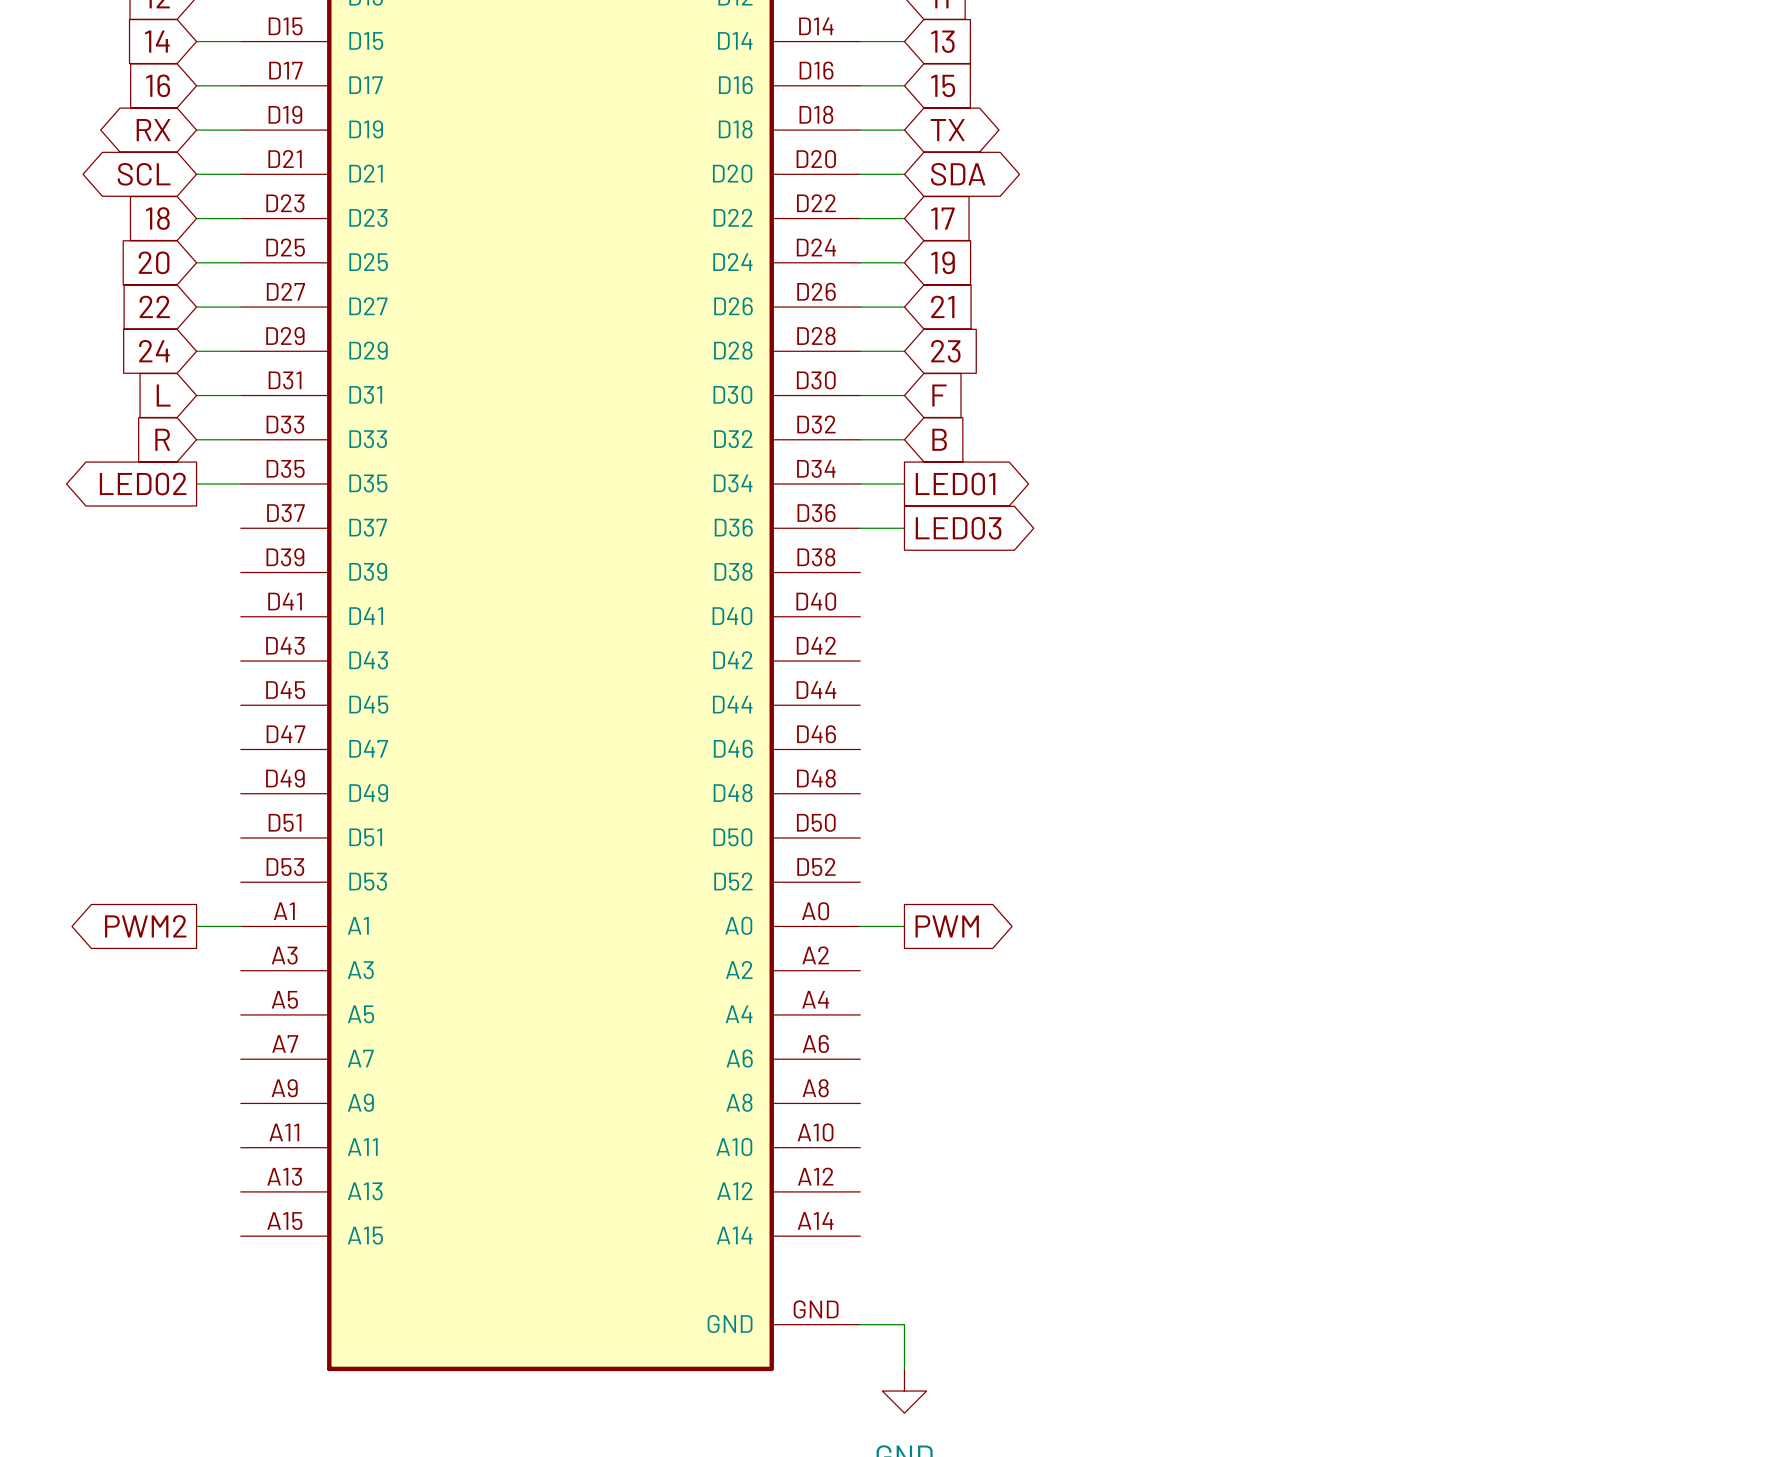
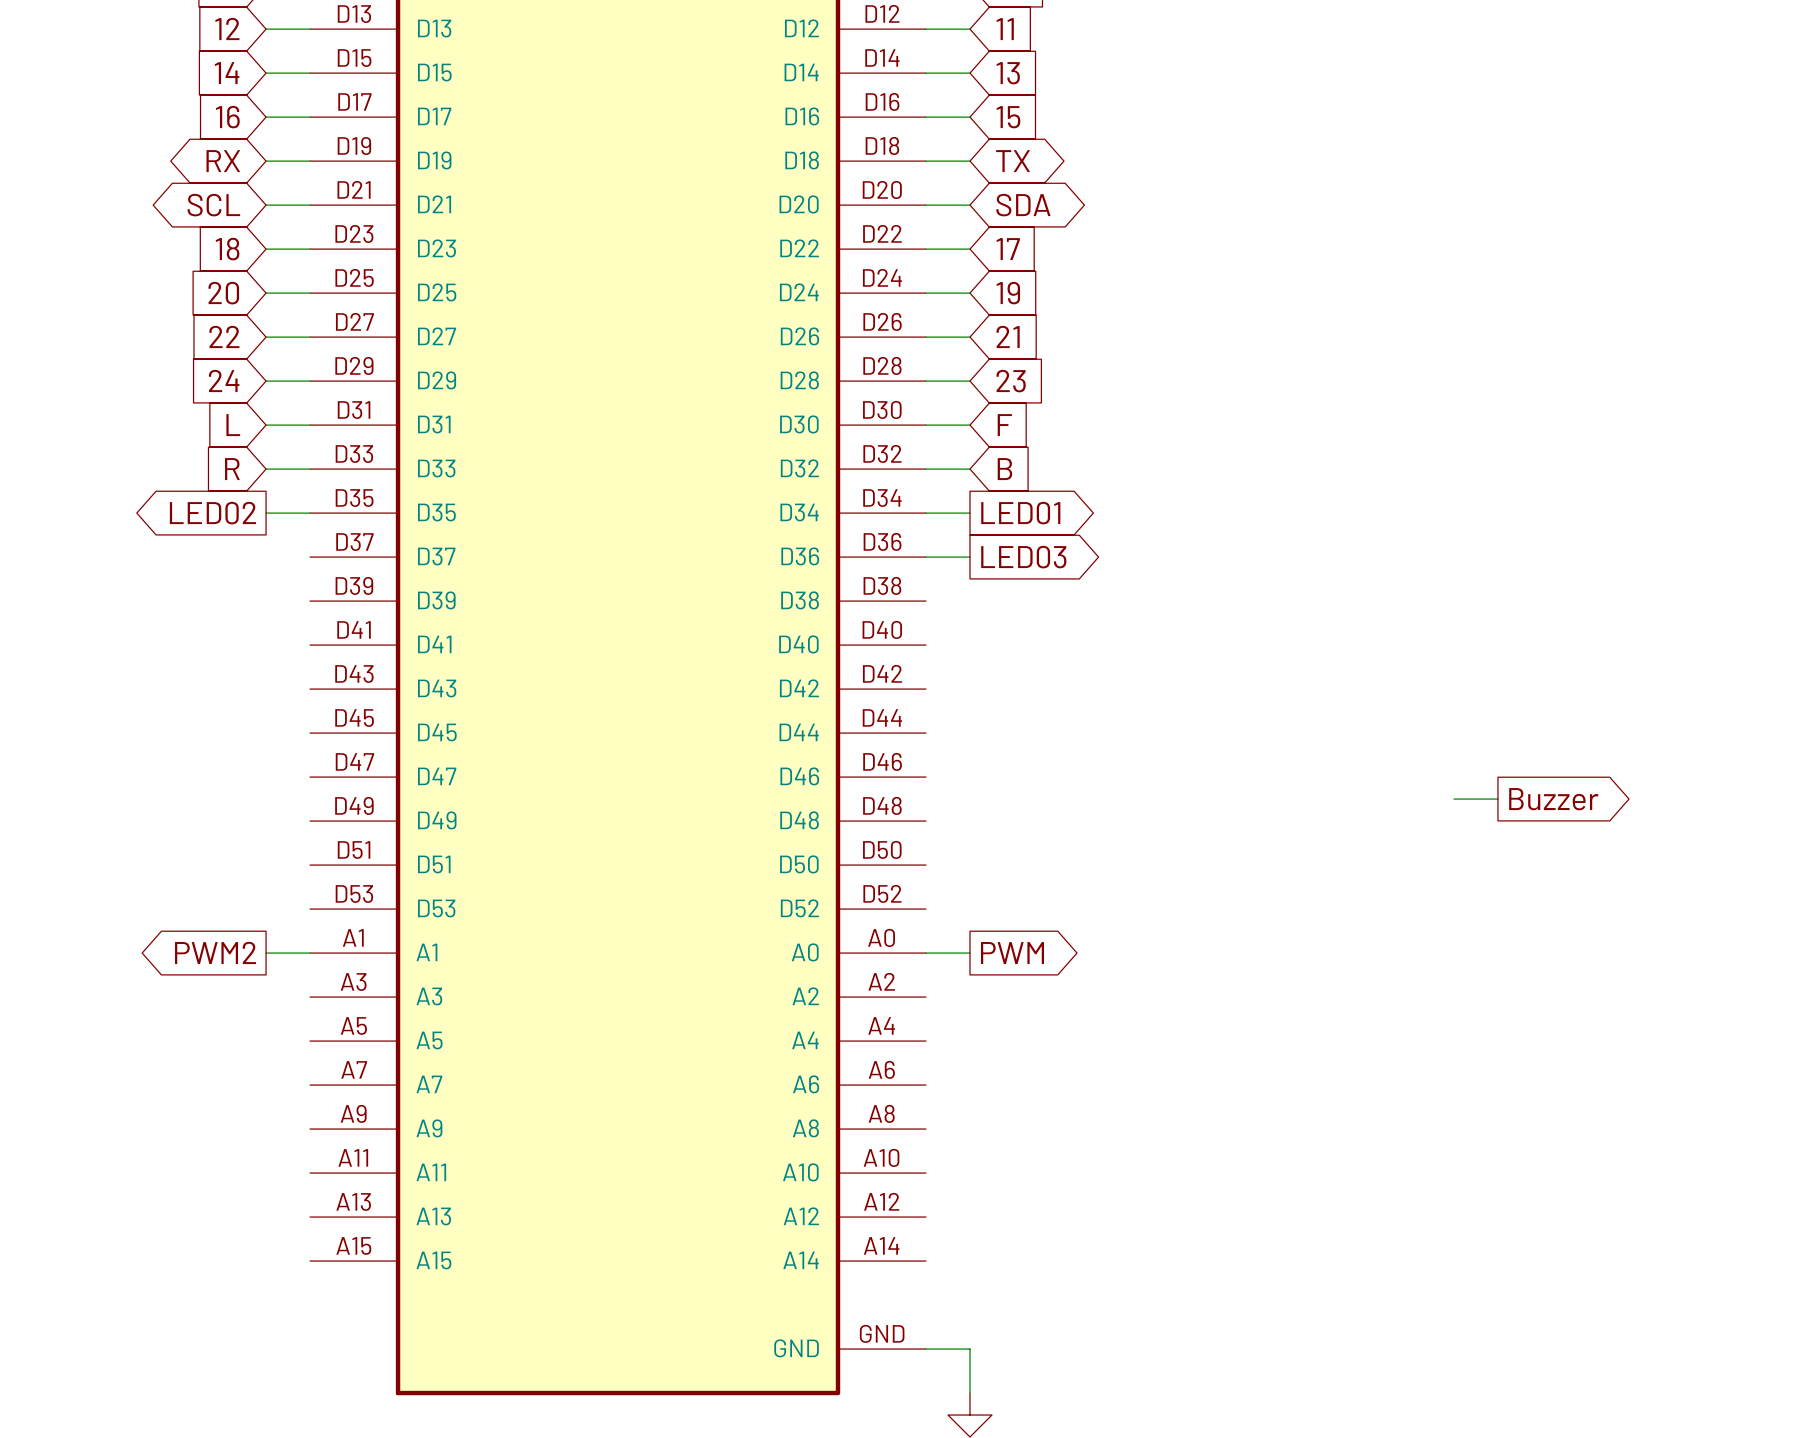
wire: none -> (1453, 799) (1497, 799)
global label: none -> Buzzer (1553, 799)

